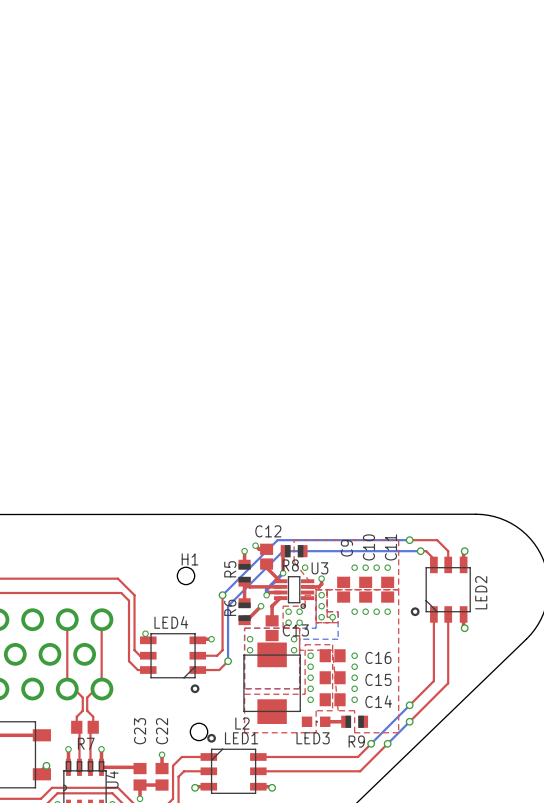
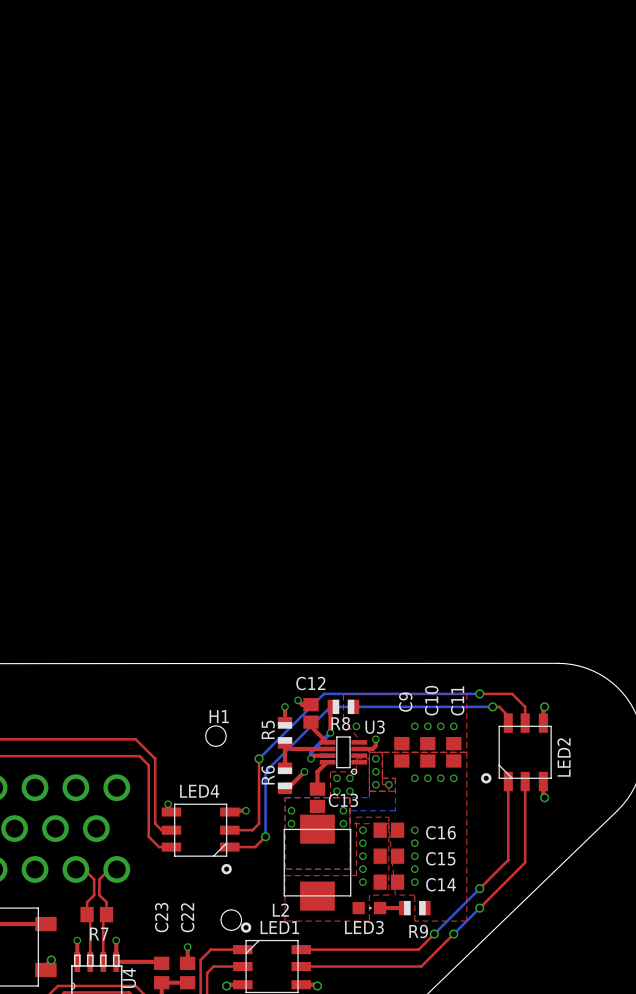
top track: (67, 619) (67, 688) -> none
top track: (101, 619) (101, 688) -> none

